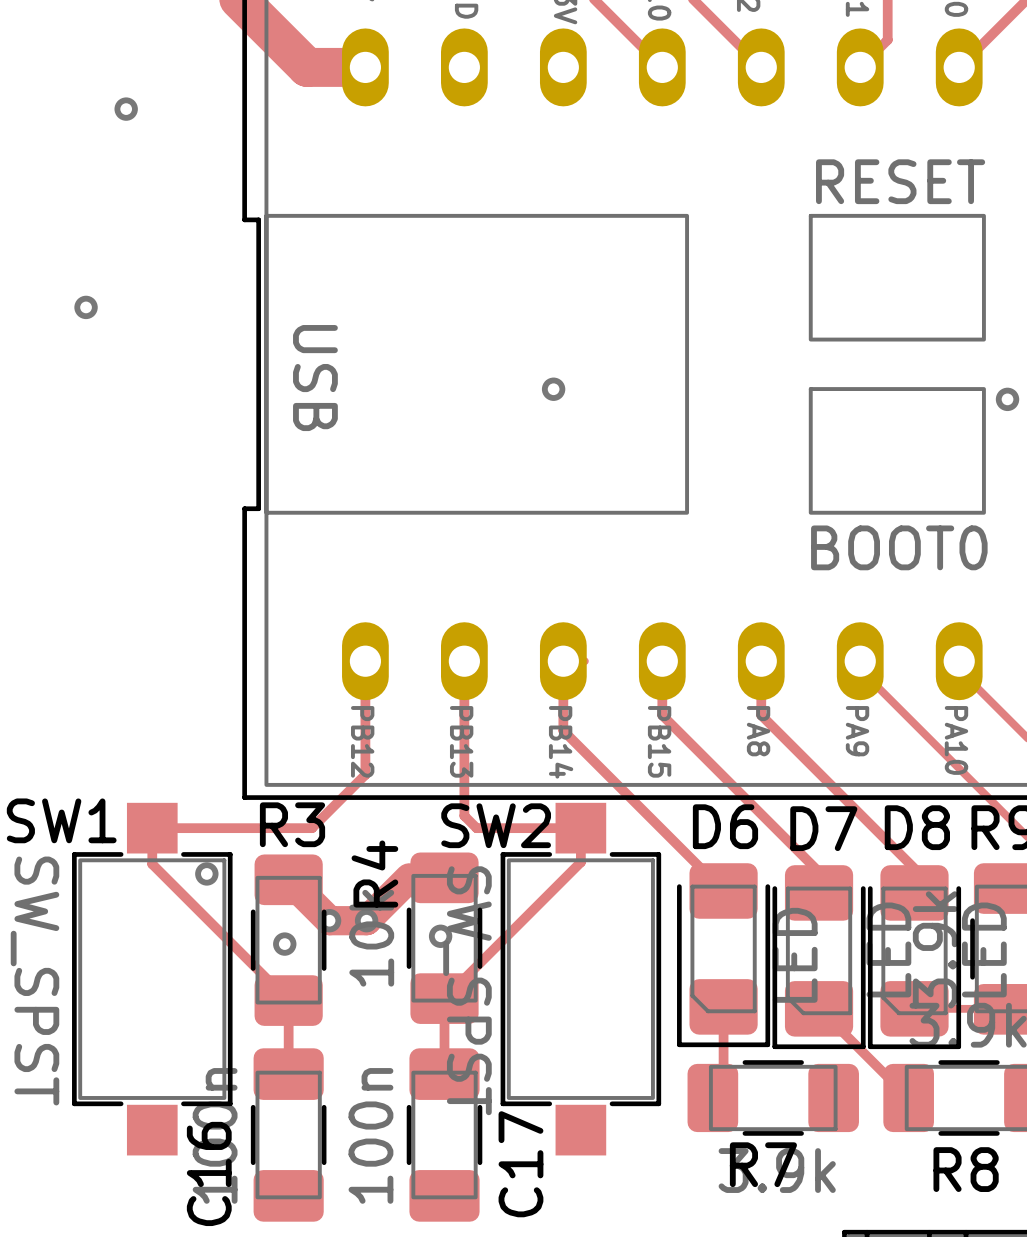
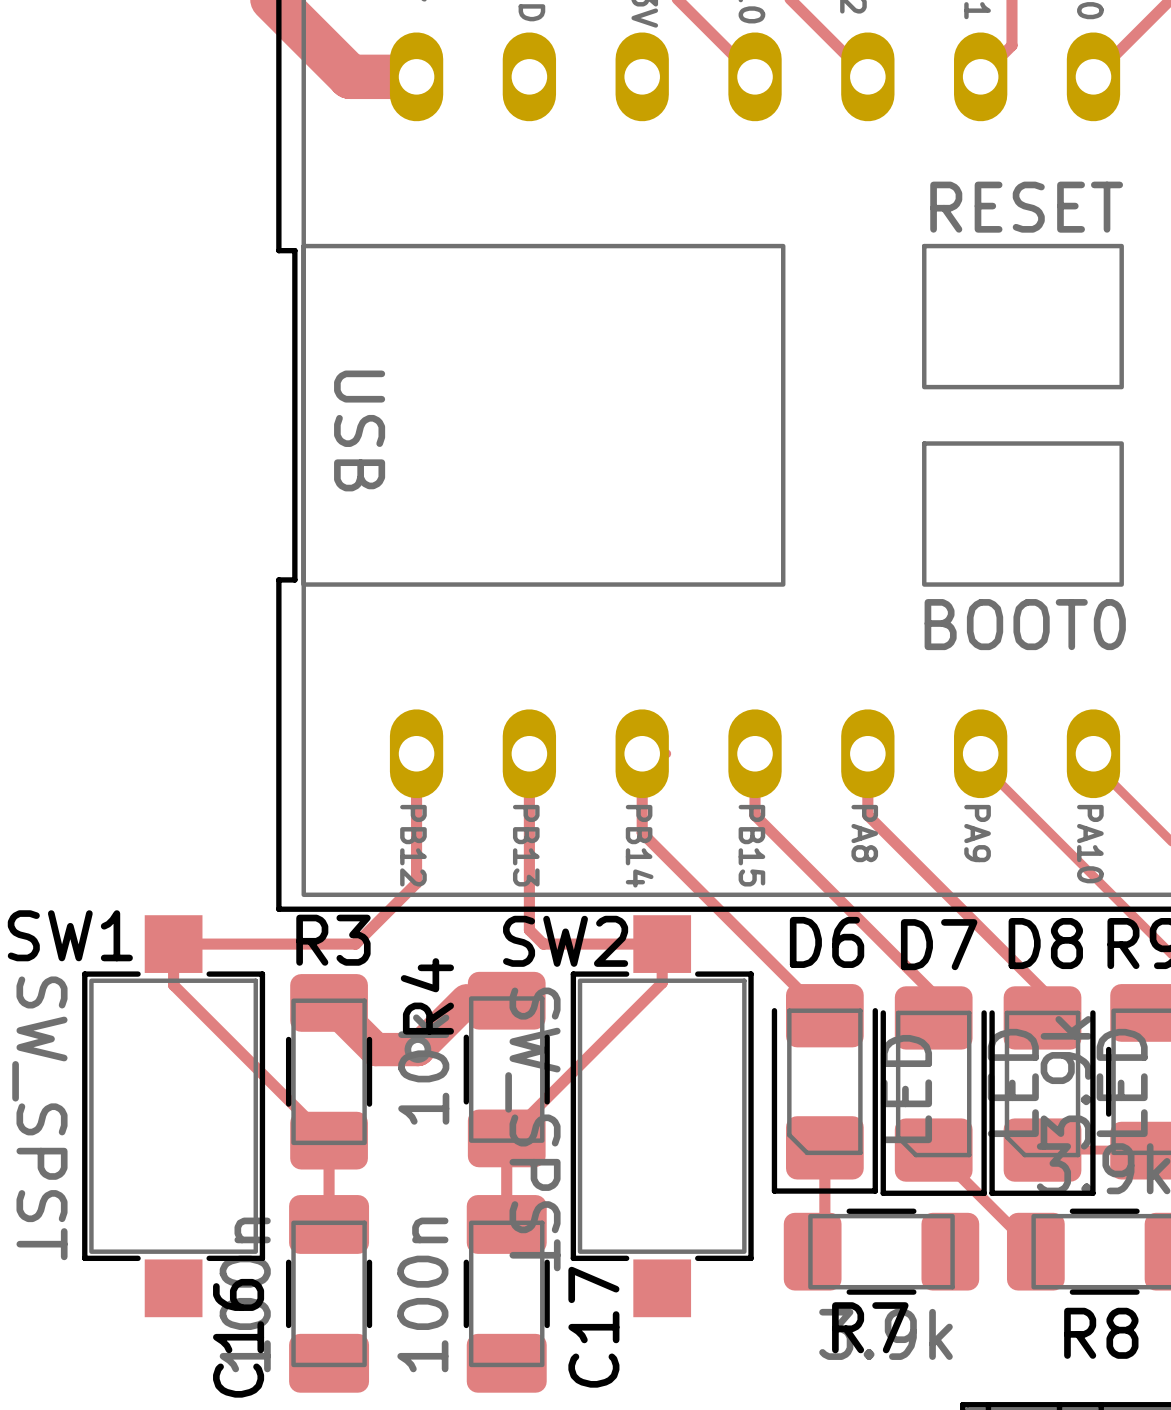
via: (126, 109) -> none
via: (86, 307) -> none
via: (553, 389) -> none
via: (1007, 399) -> none
via: (206, 873) -> none
via: (329, 920) -> none
via: (440, 936) -> none
via: (284, 944) -> none

